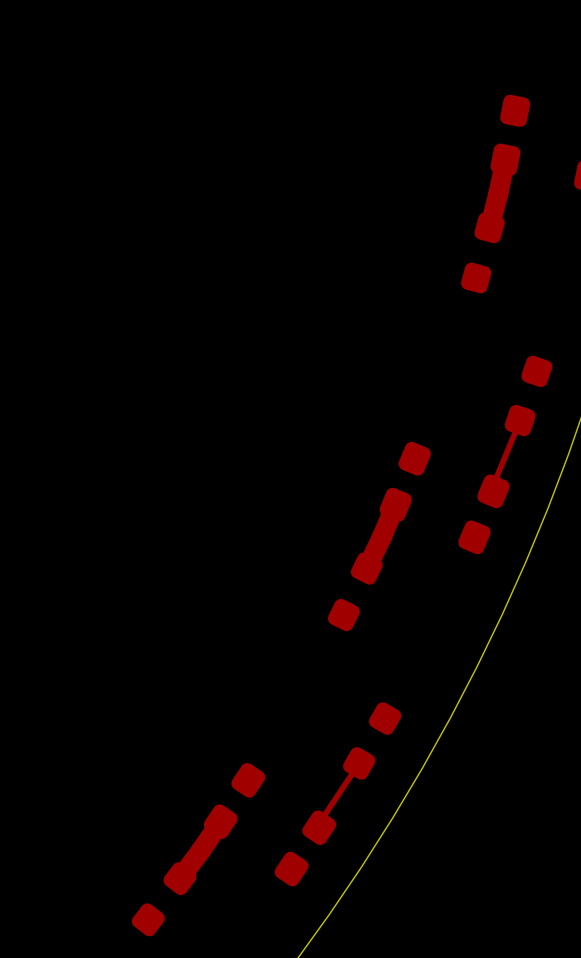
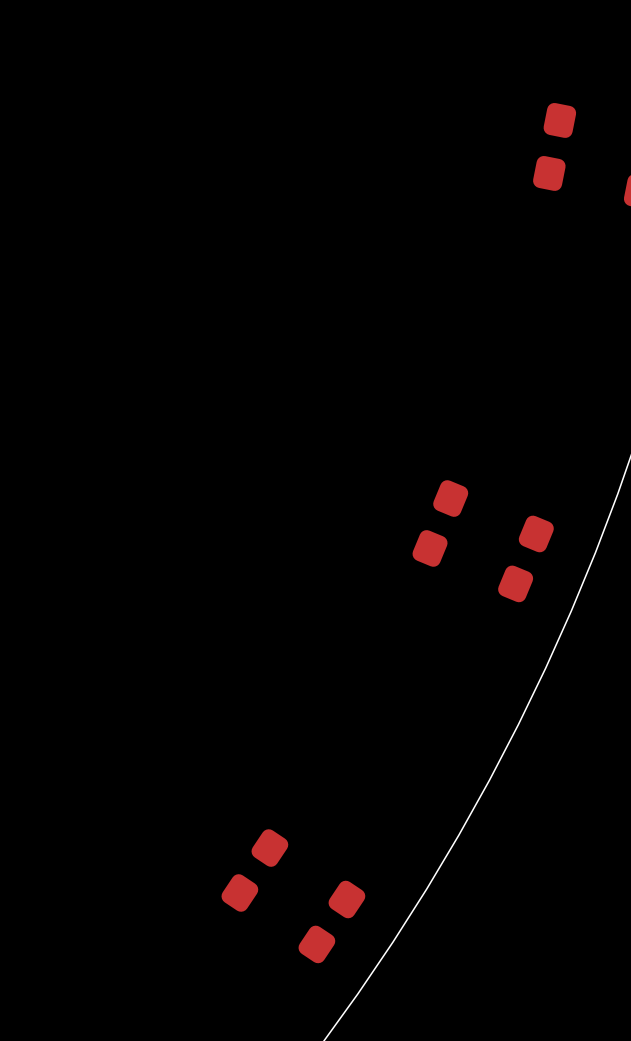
top track: (505, 159) (489, 227) -> none
part: (482, 252) -> none
part: (528, 395) -> none
top track: (520, 420) (492, 488) -> none
top track: (395, 504) (366, 568) -> none
part: (355, 591) -> none
part: (372, 741) -> none
top track: (359, 763) (318, 824) -> none
top track: (220, 821) (179, 878) -> none
part: (164, 899) -> none

